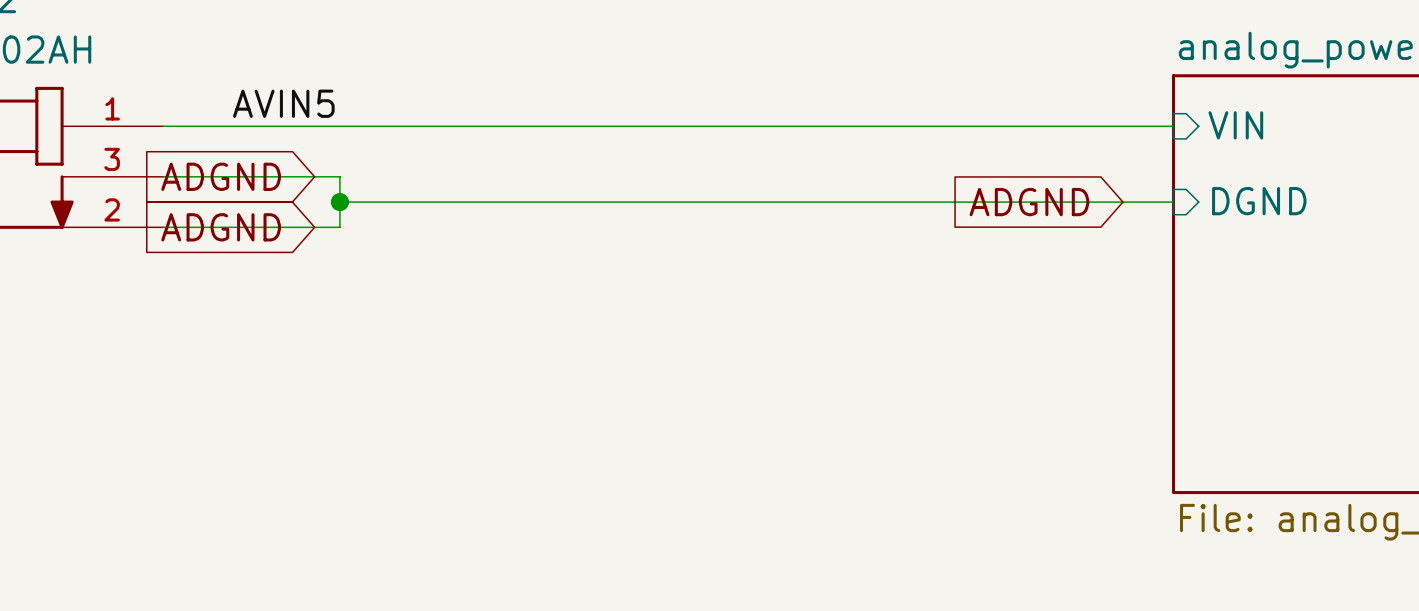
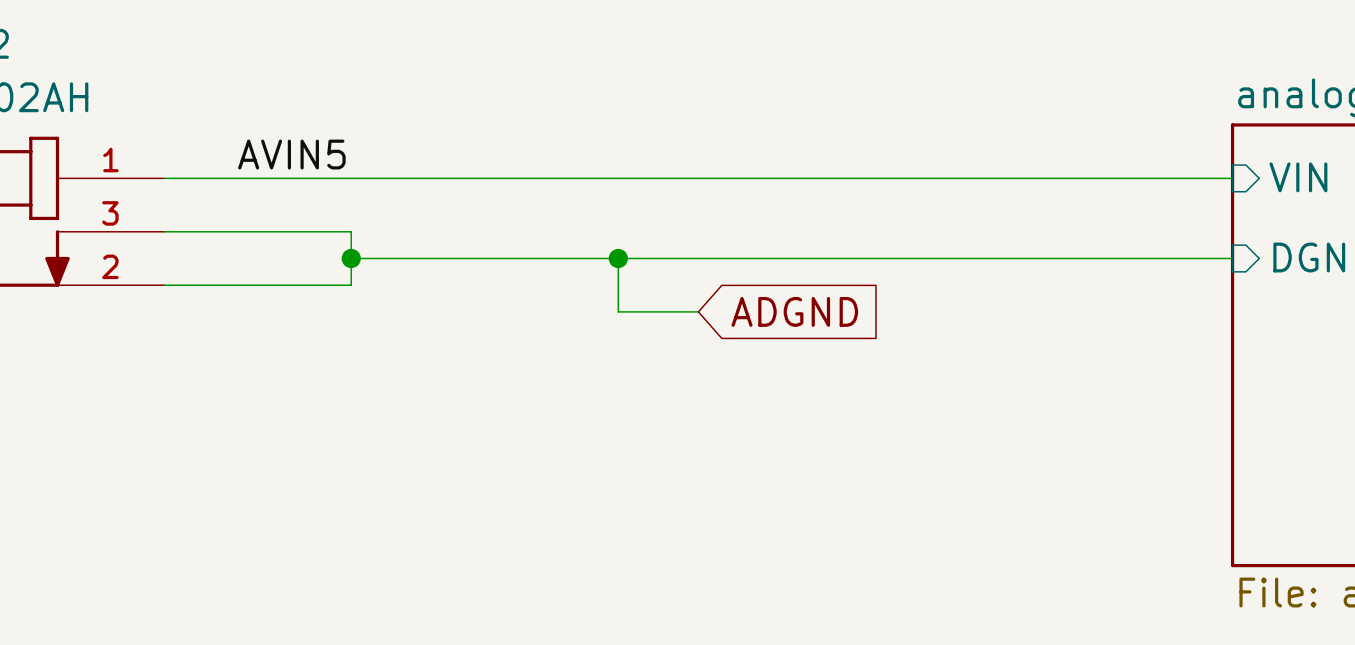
global label: ADGND (221, 176) -> none
wire: none -> (618, 258) (618, 311) (698, 311)
junction: none -> (618, 258)
global label: ADGND (1029, 202) -> none
global label: ADGND (221, 227) -> none
global label: none -> ADGND (794, 311)

